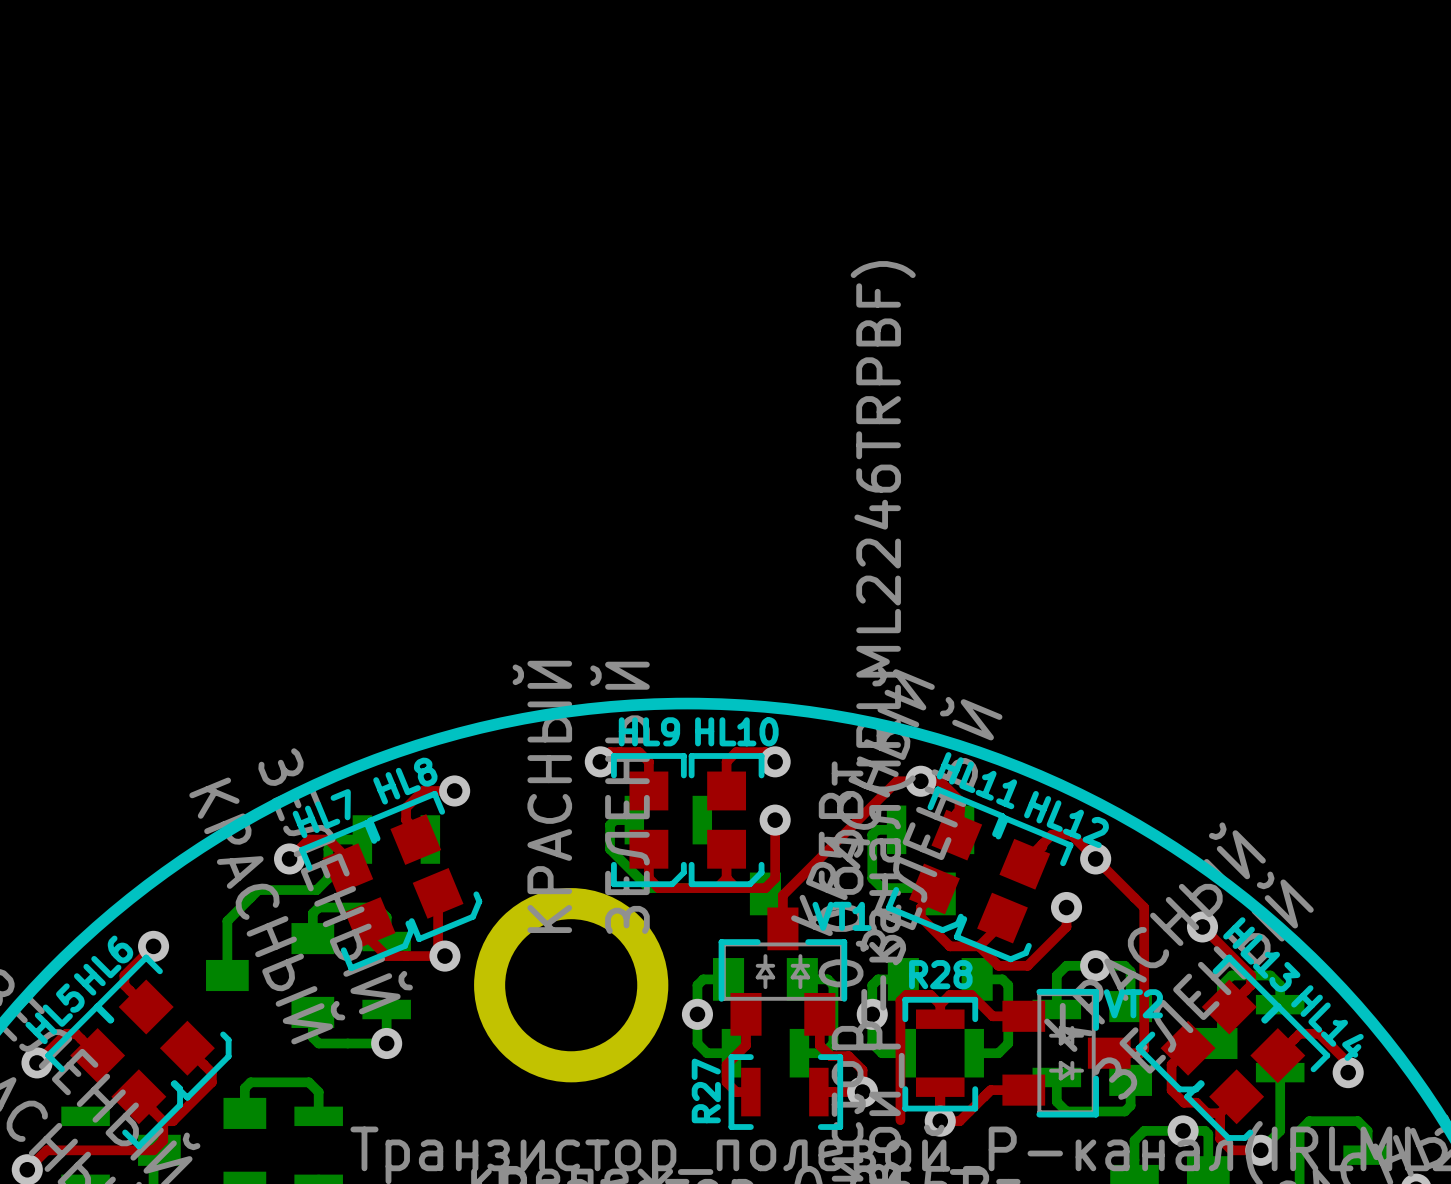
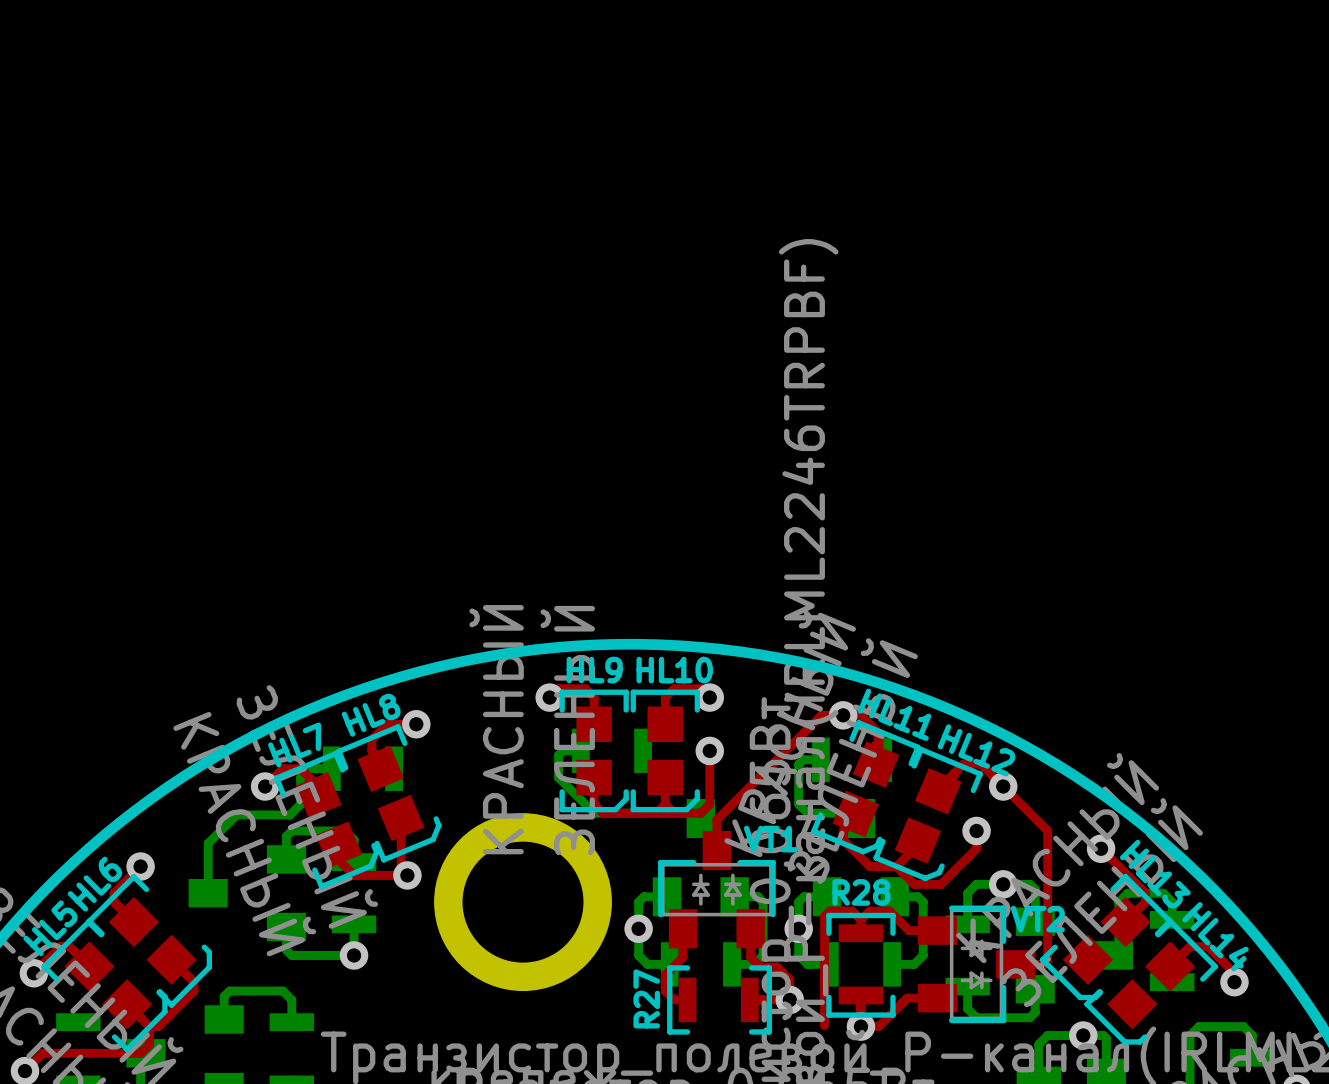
top track: (1188, 1048) (1171, 1064) (1171, 1090) (1184, 1102) (1196, 1102) (1207, 1113) (1220, 1113) -> none
bottom track: (1280, 1072) (1280, 1130) (1260, 1150) -> none
top track: (1220, 1113) (1220, 1138) (1231, 1150) (1260, 1150) -> none
via: (1260, 1150) -> none

